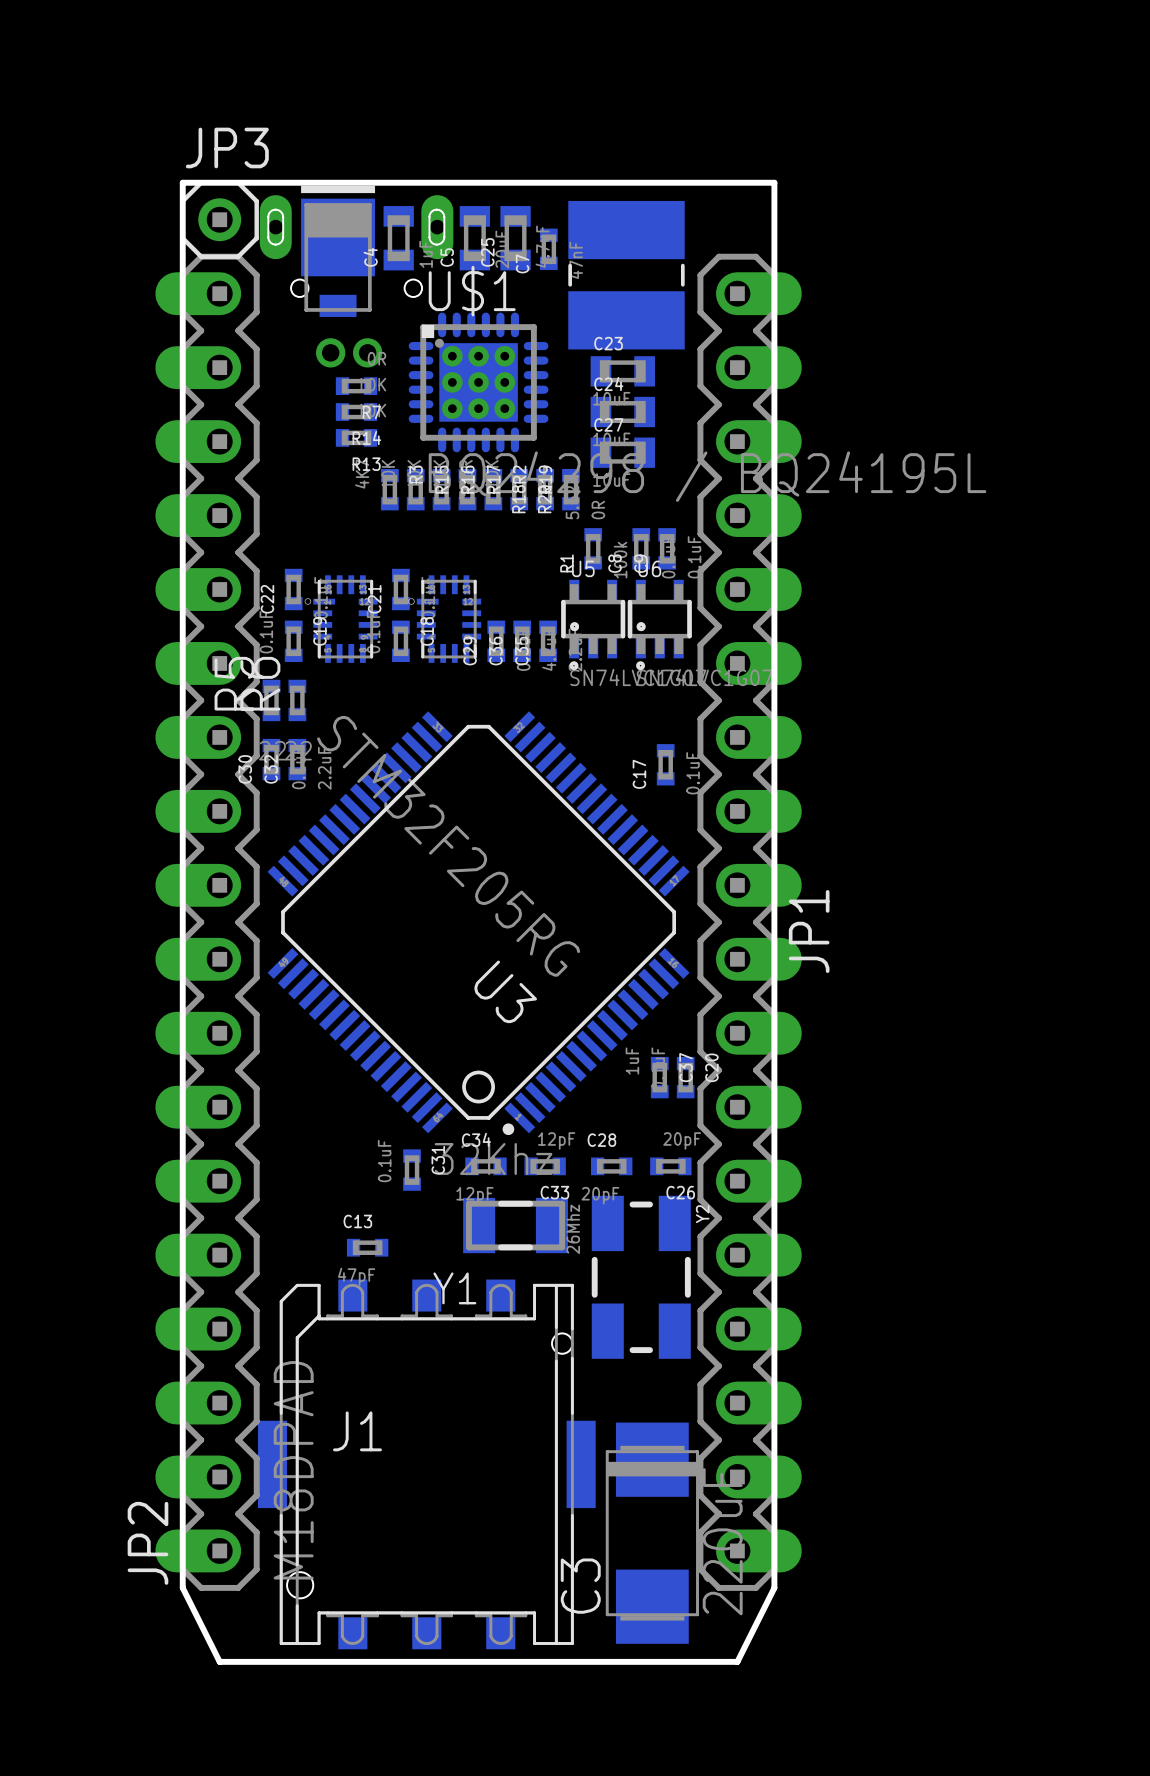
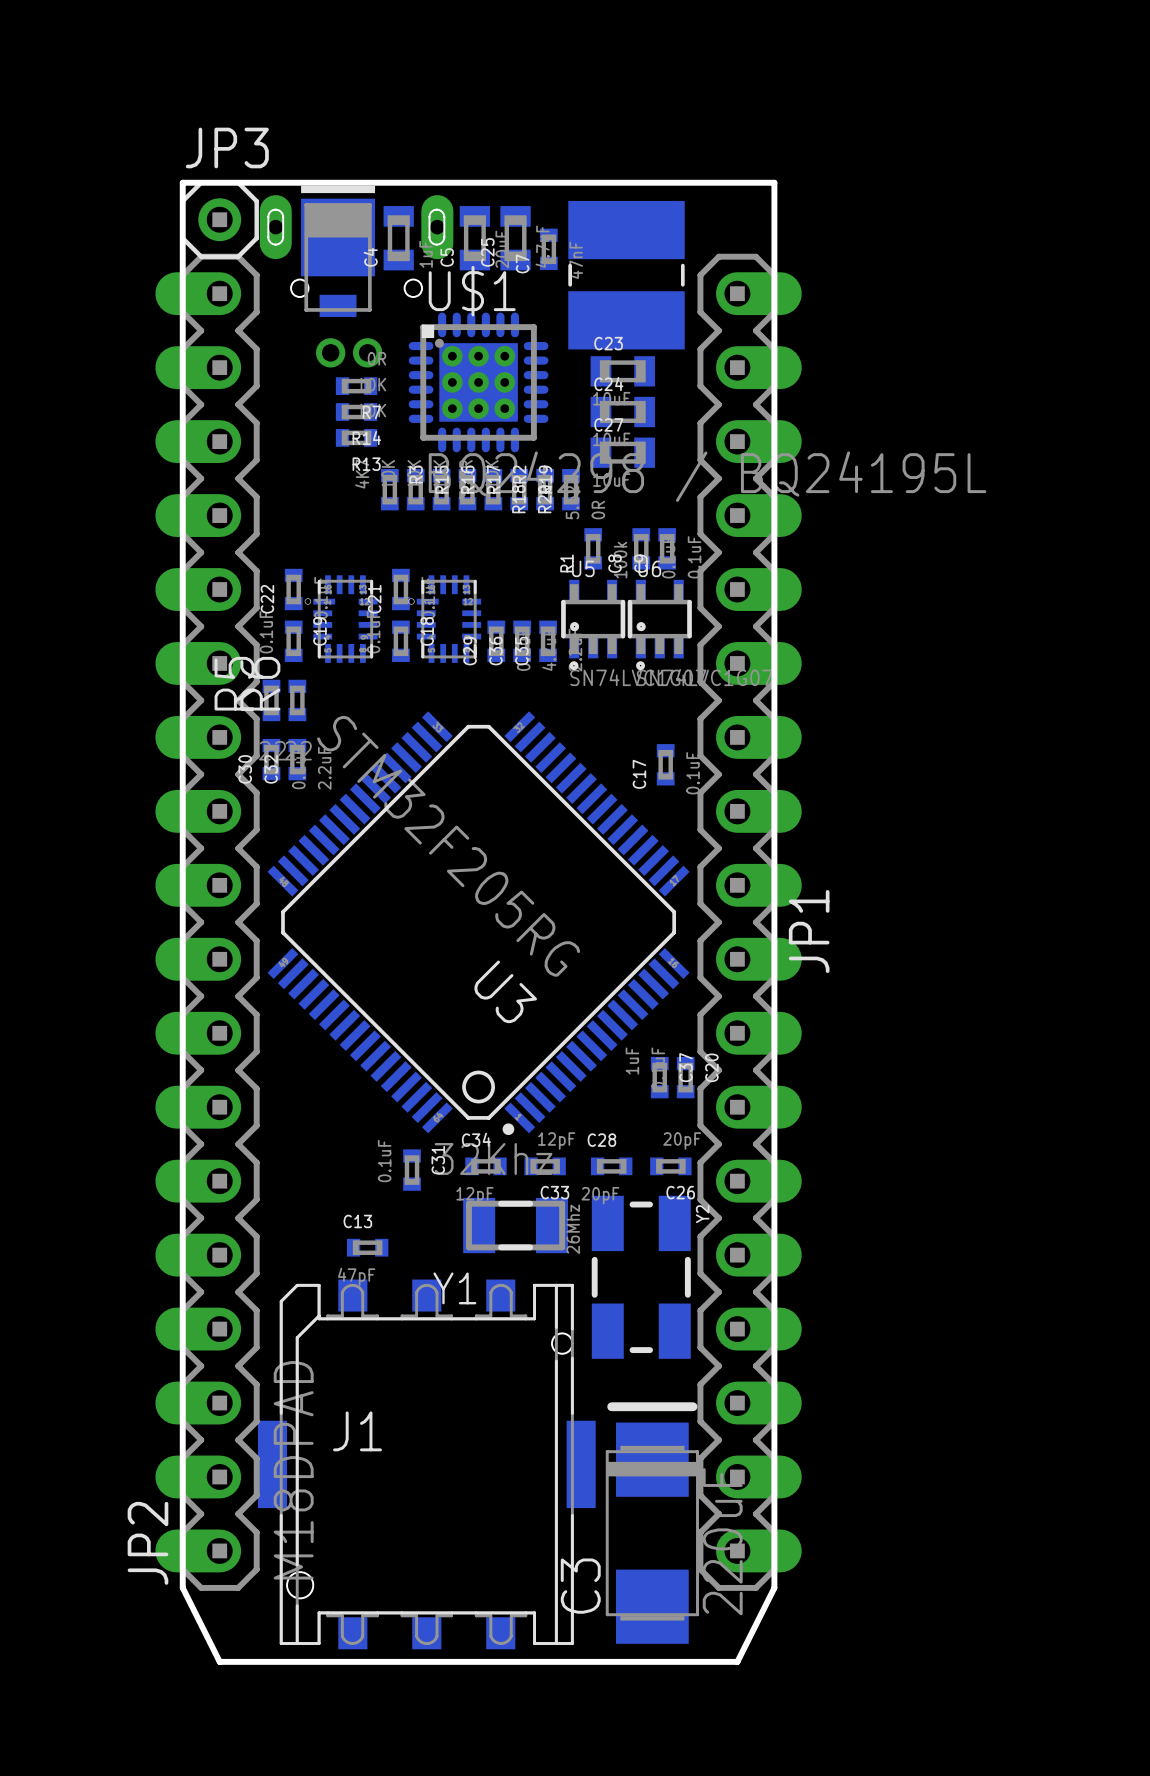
line: none -> (693, 1406) (611, 1406)

